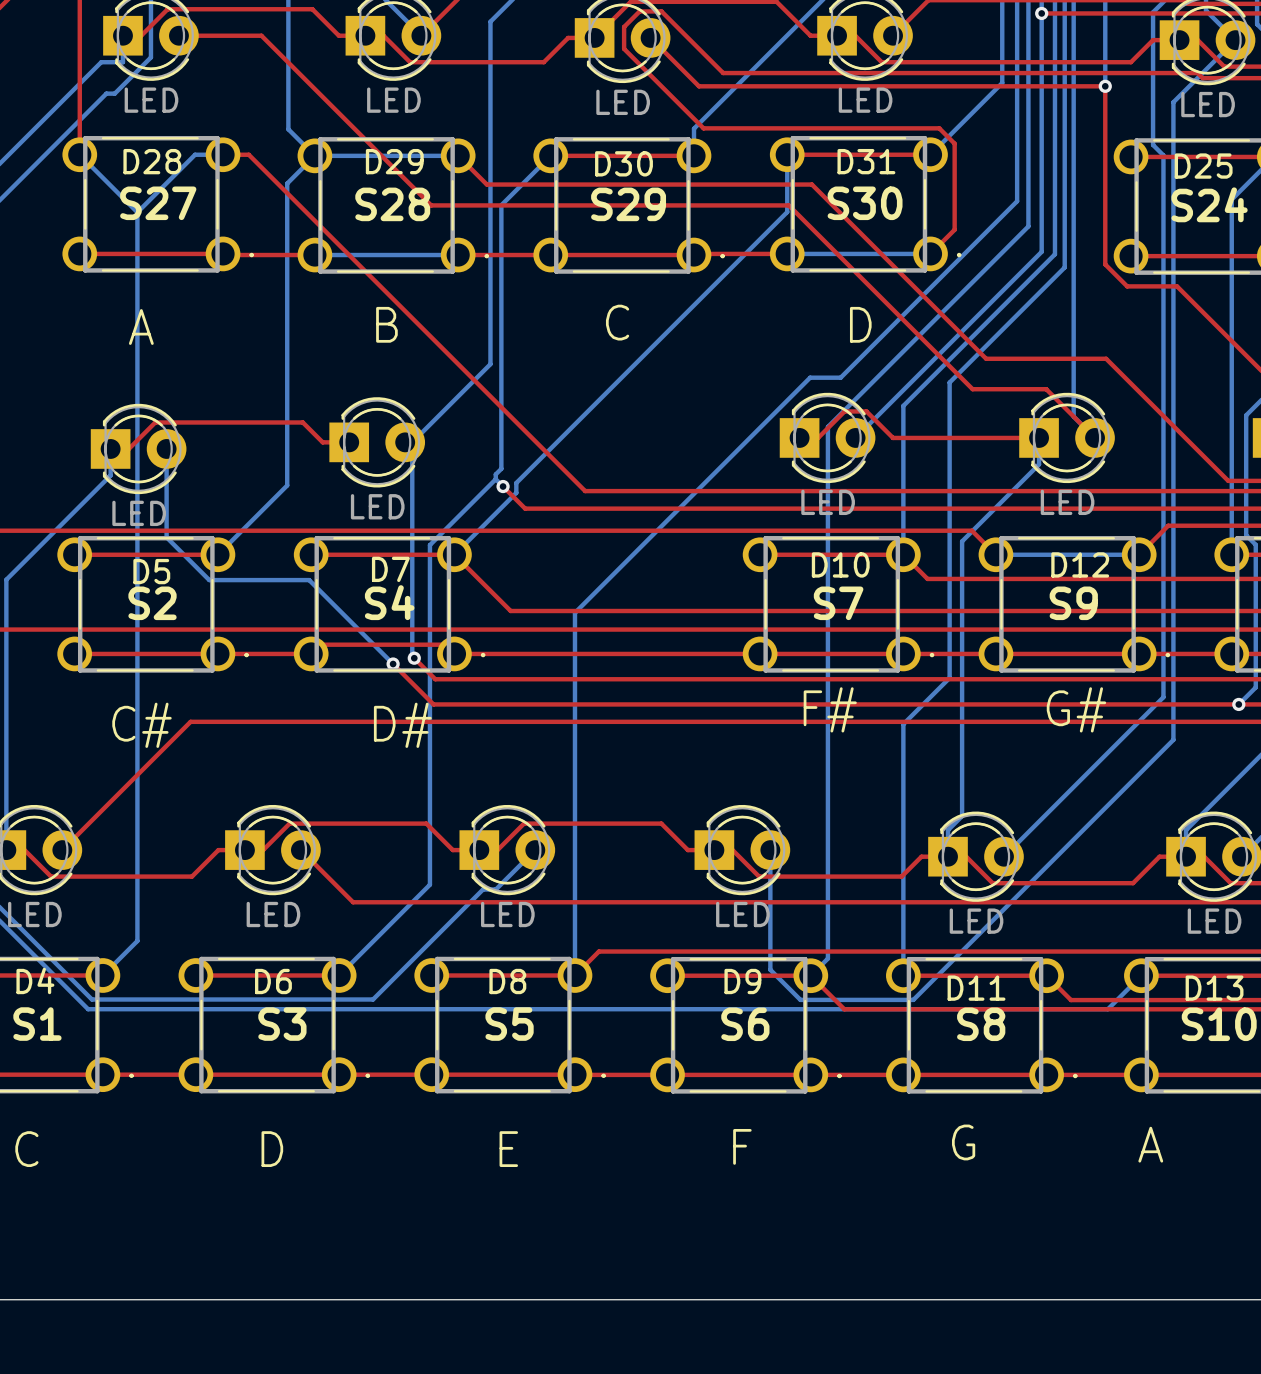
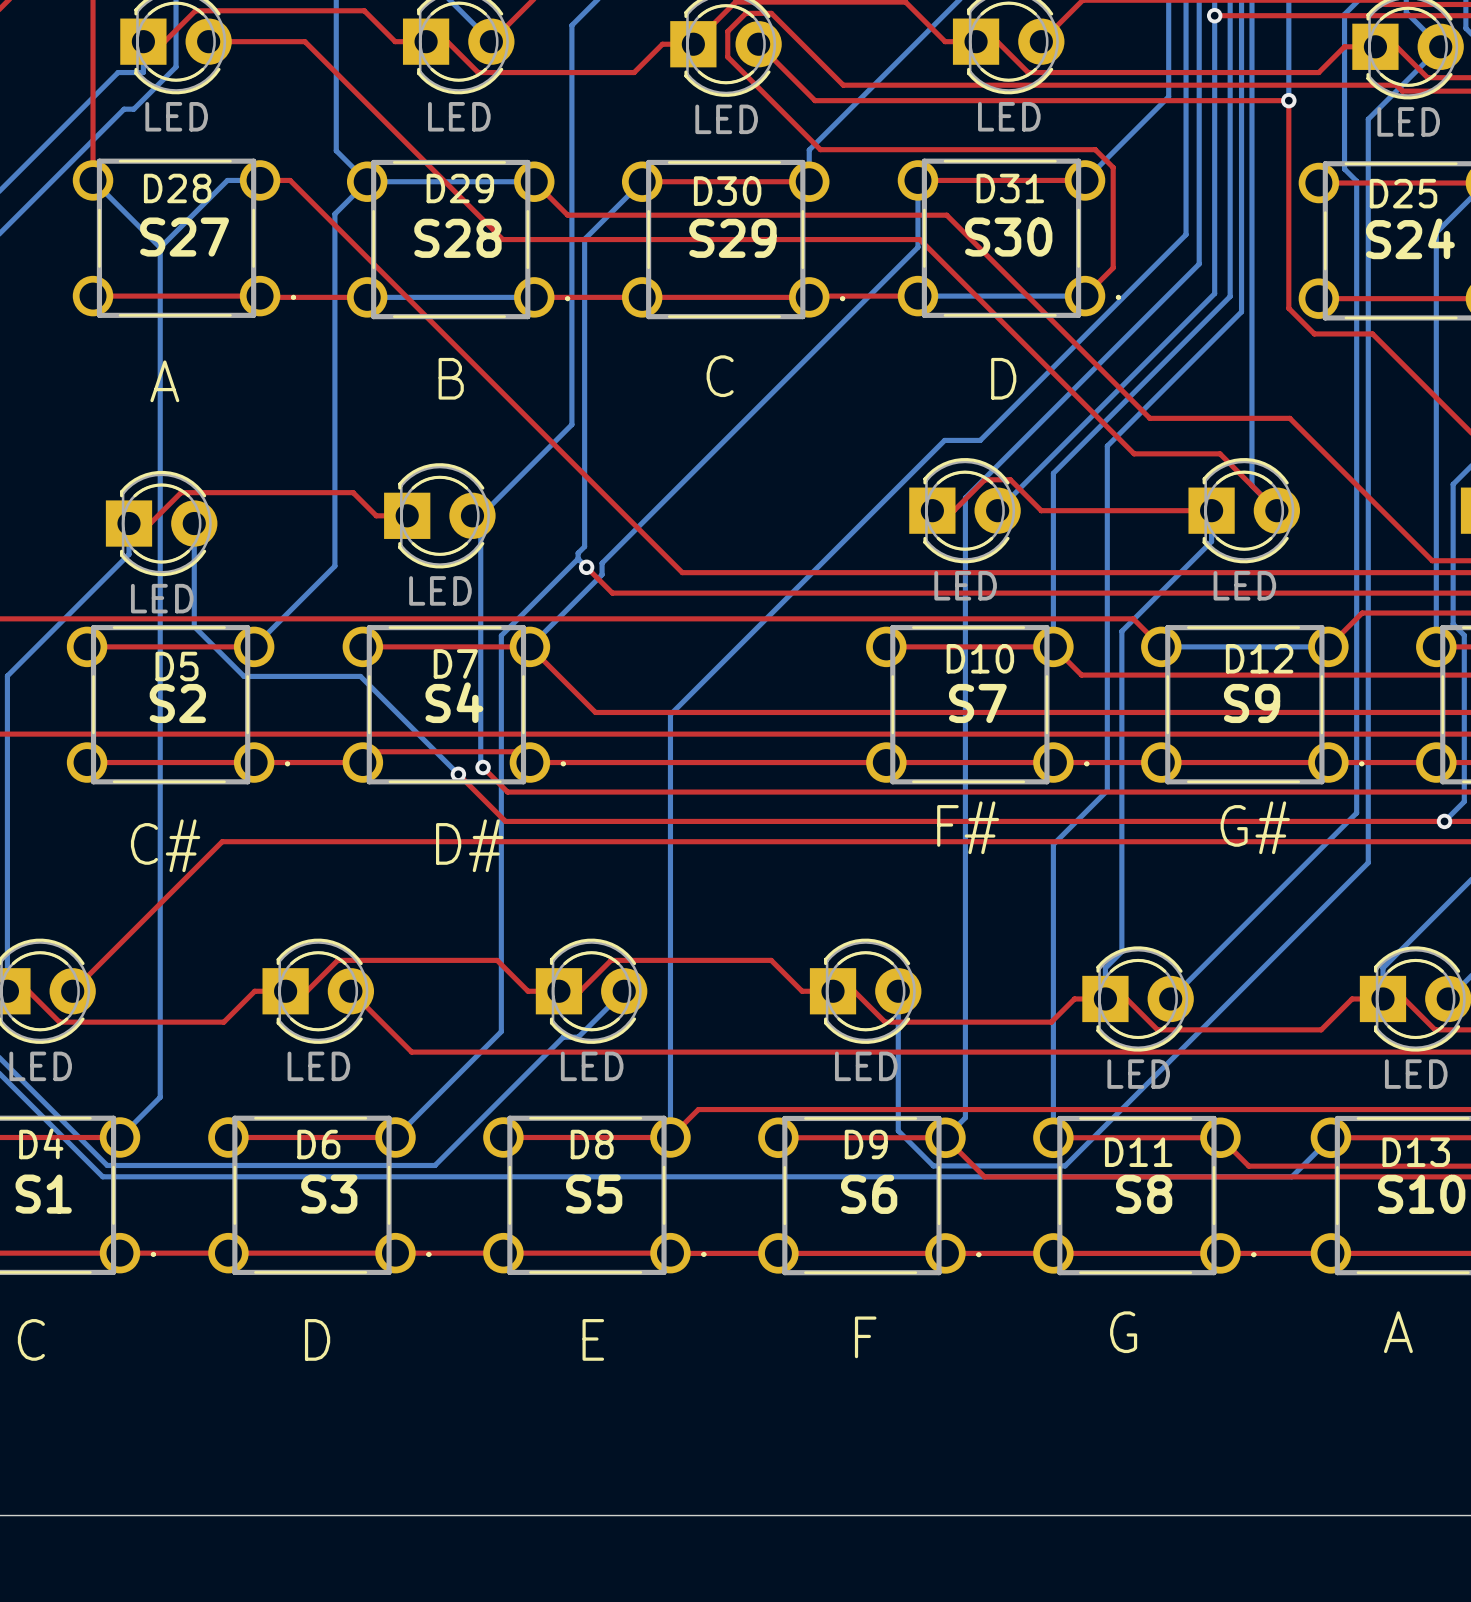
text position: A (1150, 1144) -> A (1398, 1332)

